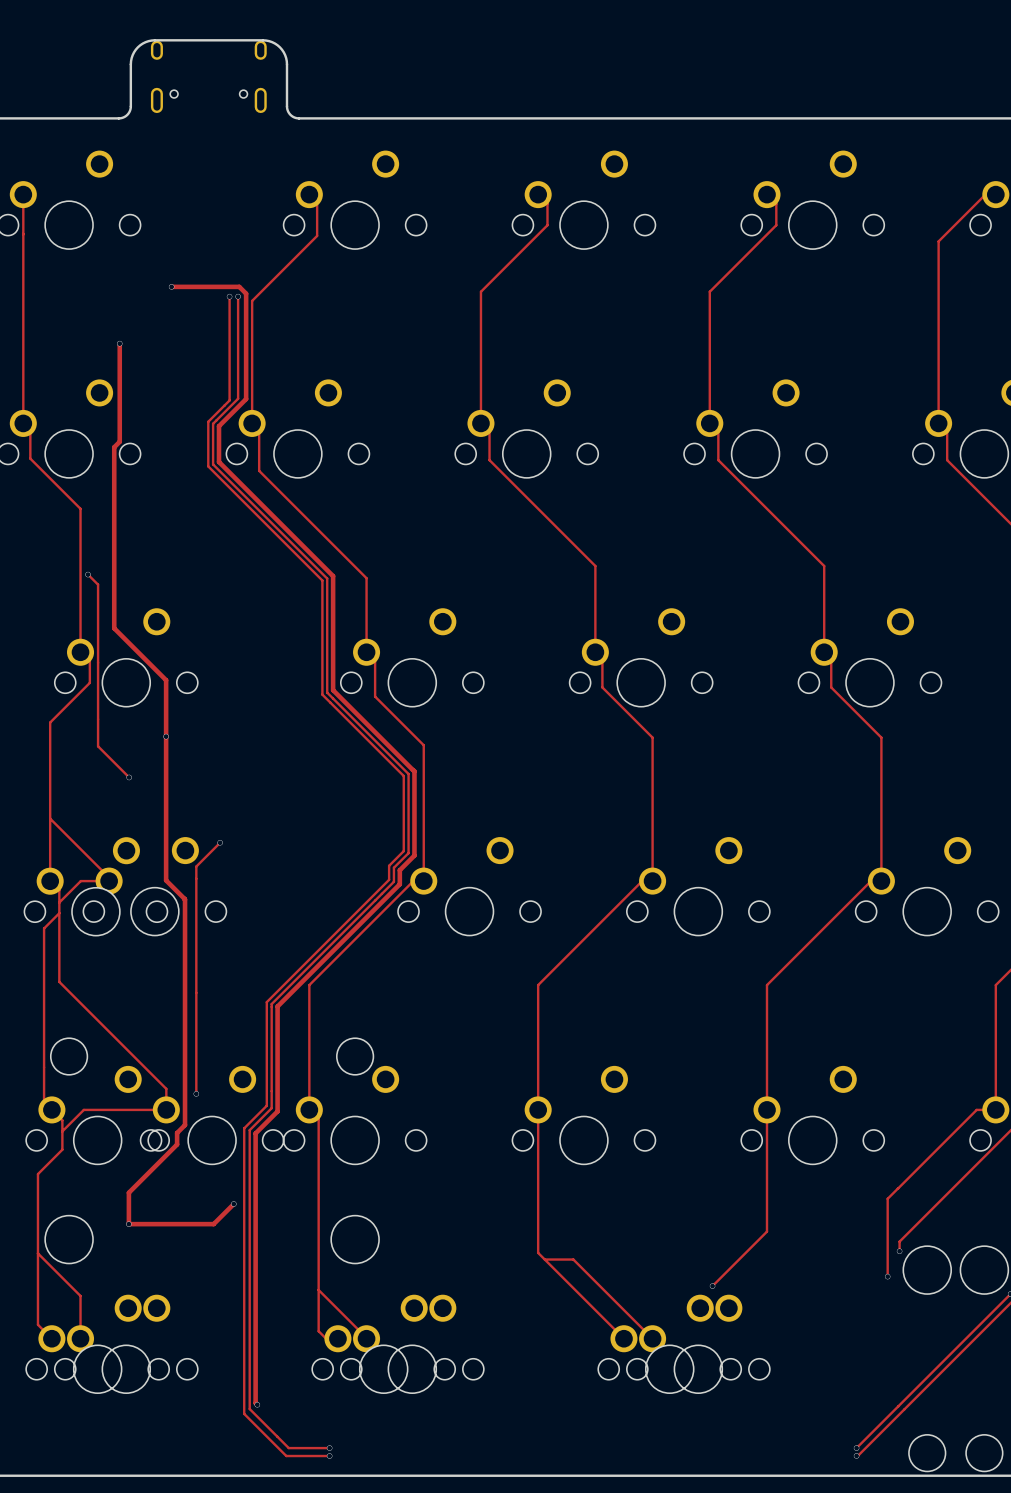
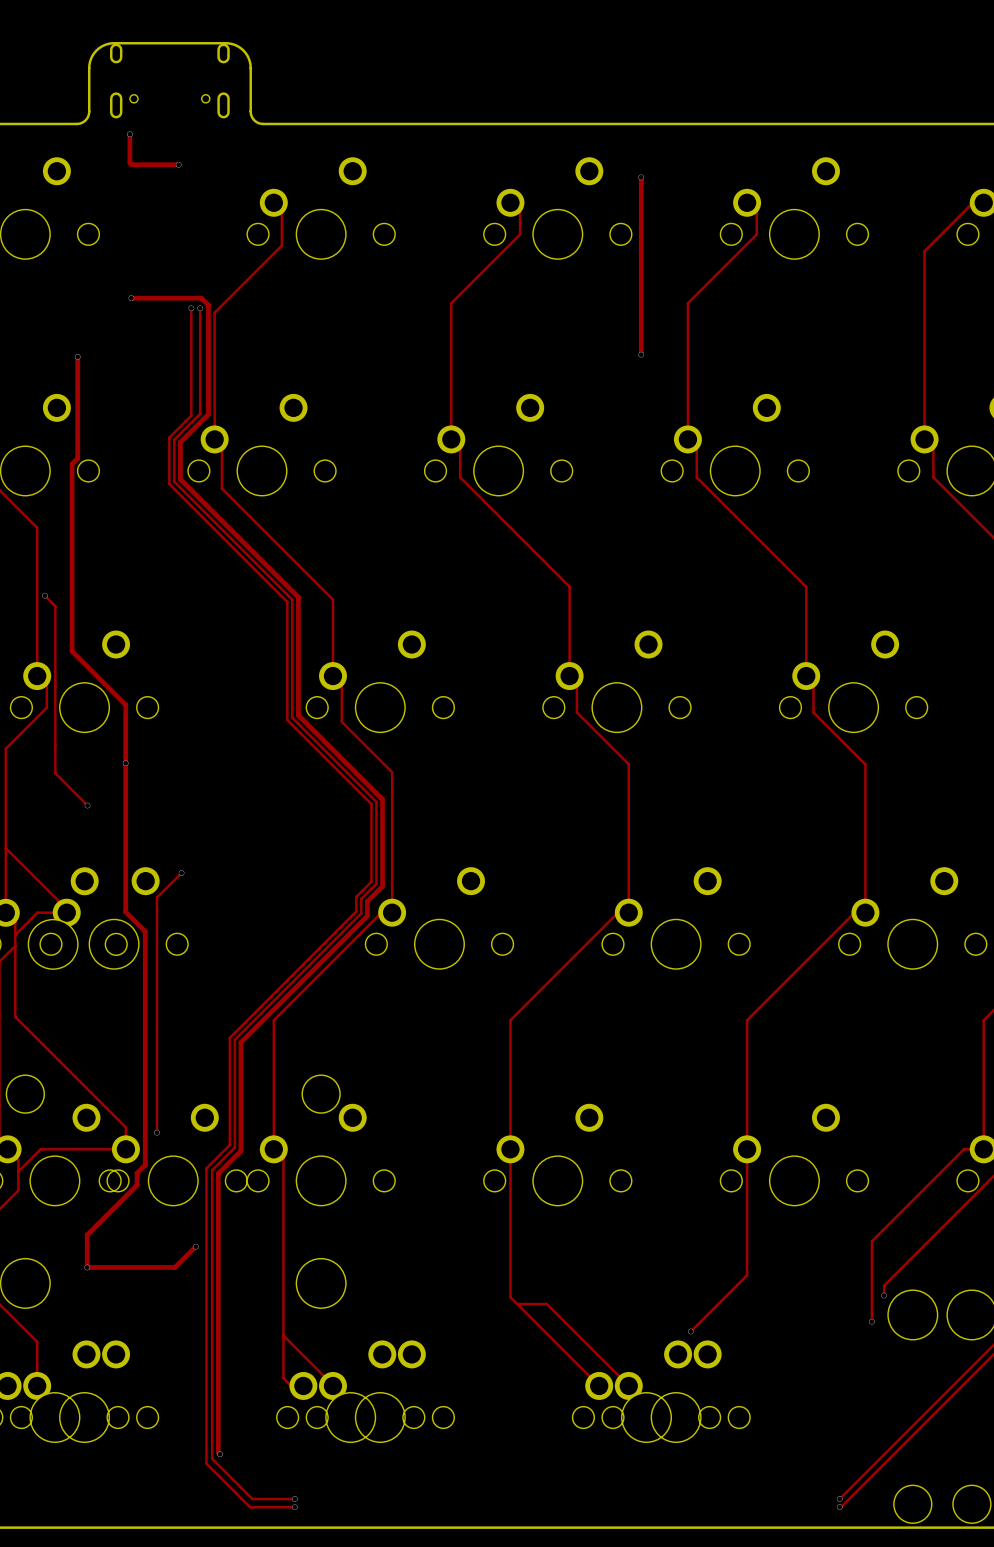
track: none -> (129, 134) (129, 162) (132, 164) (178, 164)
via: none -> (129, 134)
via: none -> (178, 164)
track: none -> (641, 177) (641, 354)
via: none -> (641, 177)
via: none -> (641, 354)

